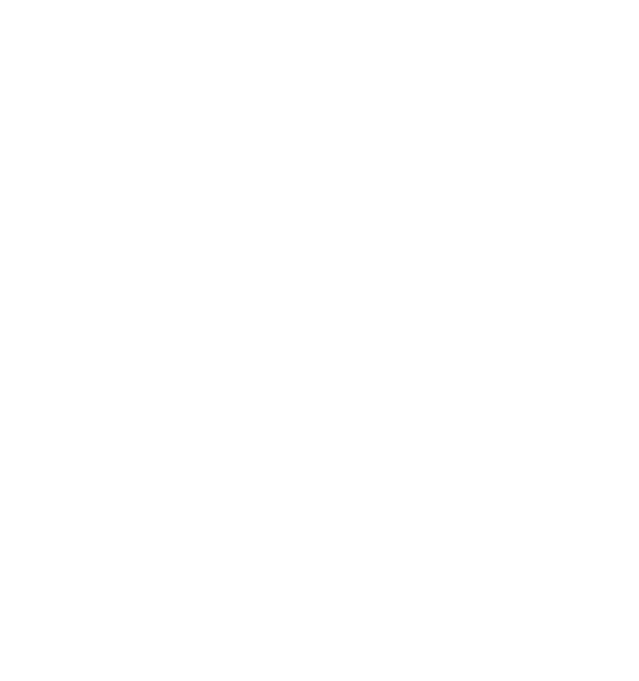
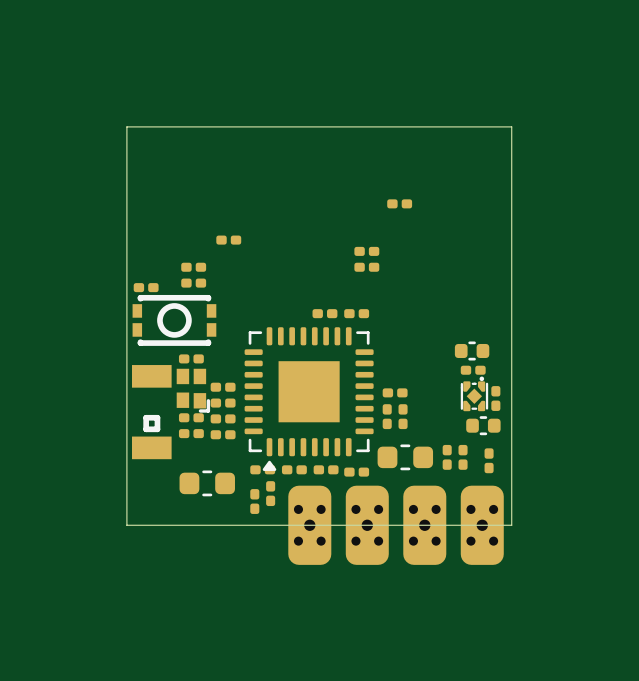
board edge: none -> (511, 126) (126, 126) (126, 525) (511, 525) (511, 126)
part: none -> (399, 203)
part: none -> (228, 240)
part: none -> (366, 251)
part: none -> (193, 267)
part: none -> (366, 267)
part: none -> (193, 283)
part: none -> (146, 287)
part: none -> (324, 313)
part: none -> (356, 313)
part: none -> (174, 320)
part: none -> (472, 350)
part: none -> (191, 358)
part: none -> (473, 370)
part: none -> (223, 387)
part: none -> (193, 390)
part: none -> (395, 392)
part: none -> (474, 393)
part: none -> (495, 398)
part: none -> (309, 399)
part: none -> (223, 403)
part: none -> (151, 412)
part: none -> (387, 416)
part: none -> (403, 416)
part: none -> (191, 417)
part: none -> (223, 418)
part: none -> (483, 425)
part: none -> (191, 433)
part: none -> (223, 434)
part: none -> (405, 457)
part: none -> (447, 457)
part: none -> (463, 457)
part: none -> (489, 460)
part: none -> (262, 469)
part: none -> (294, 469)
part: none -> (326, 469)
part: none -> (356, 472)
part: none -> (207, 483)
part: none -> (270, 493)
part: none -> (254, 501)
part: none -> (309, 525)
part: none -> (367, 525)
part: none -> (424, 525)
part: none -> (482, 525)

